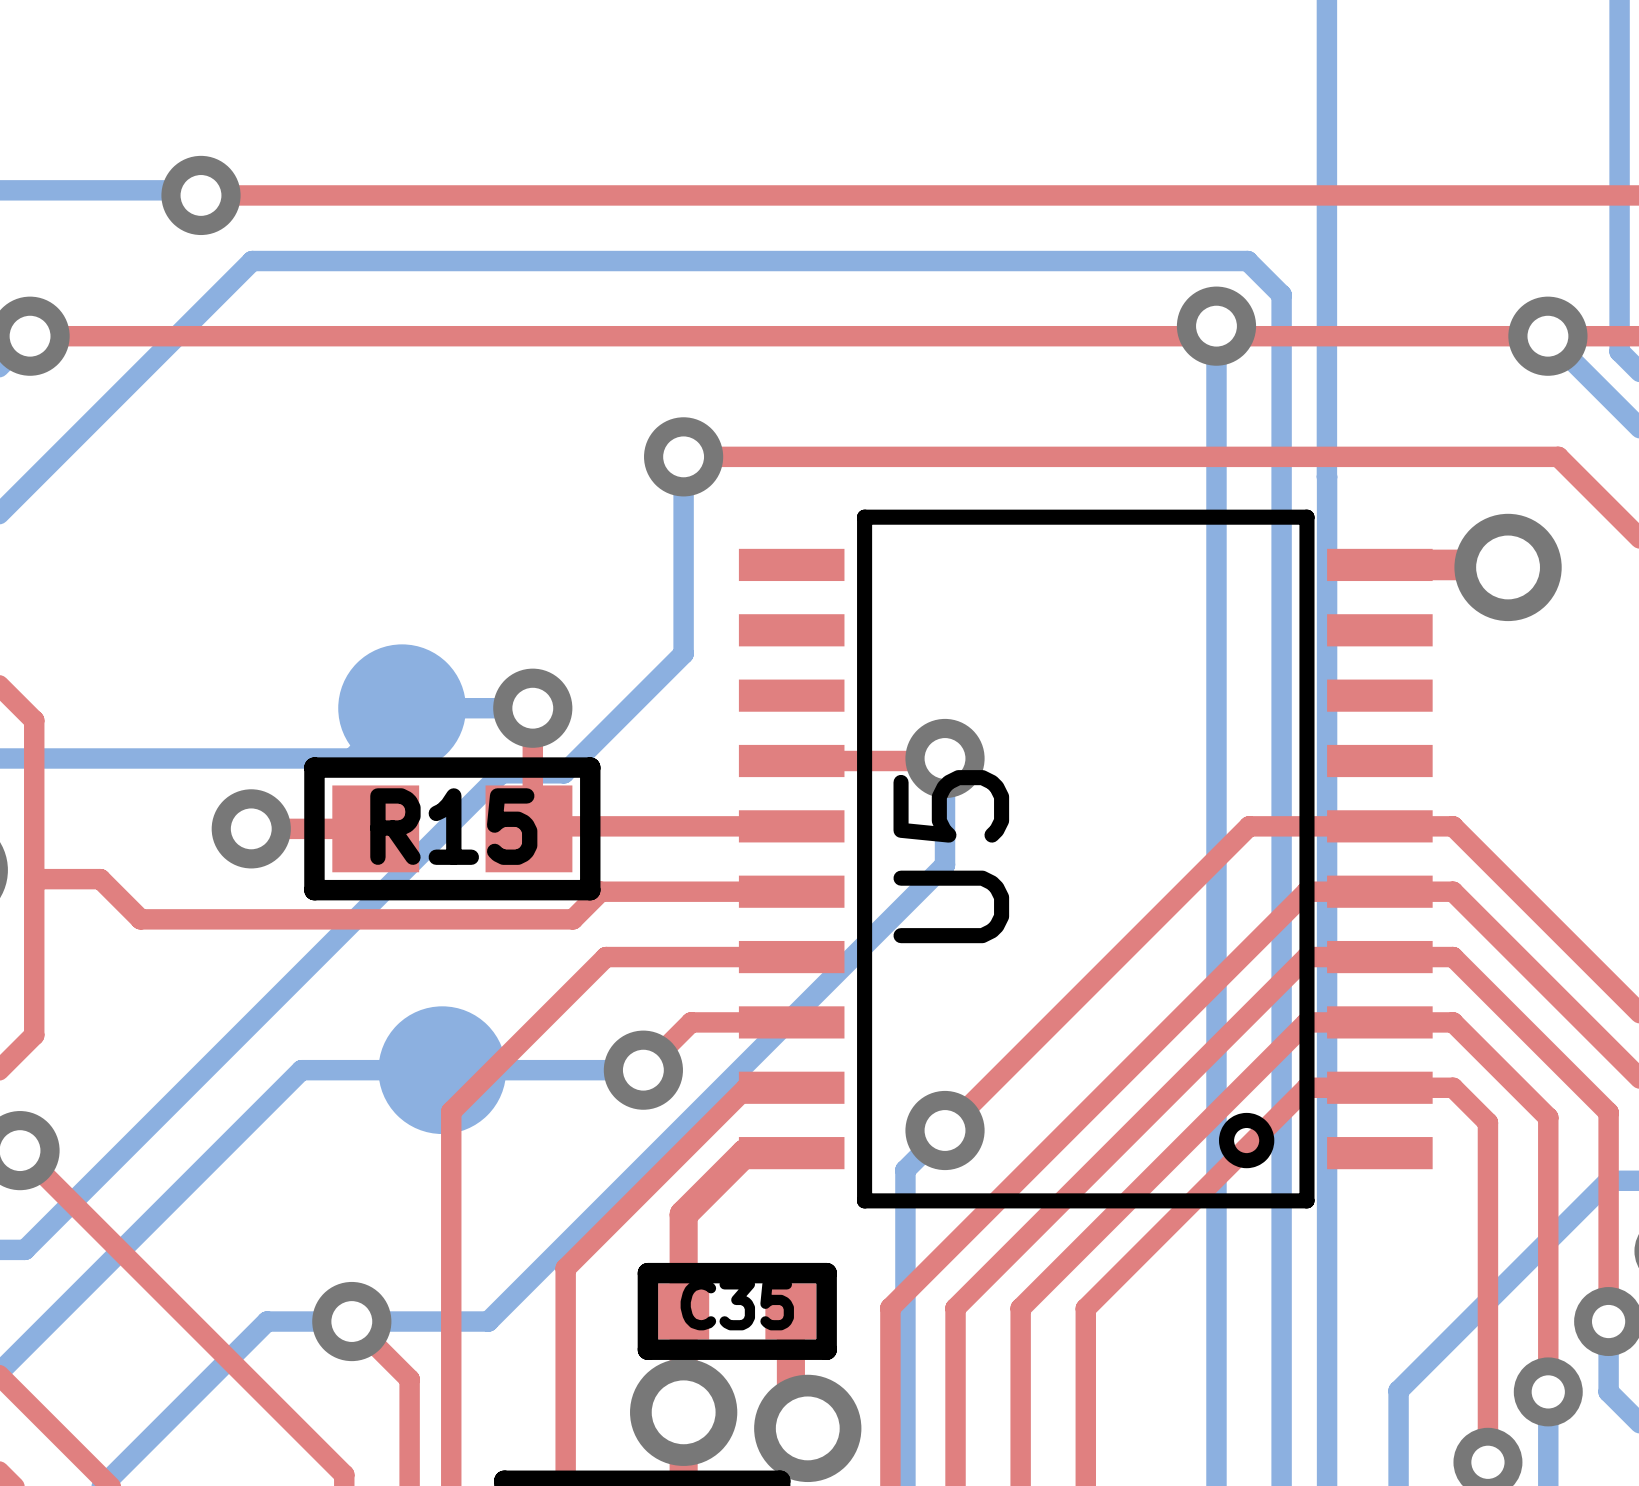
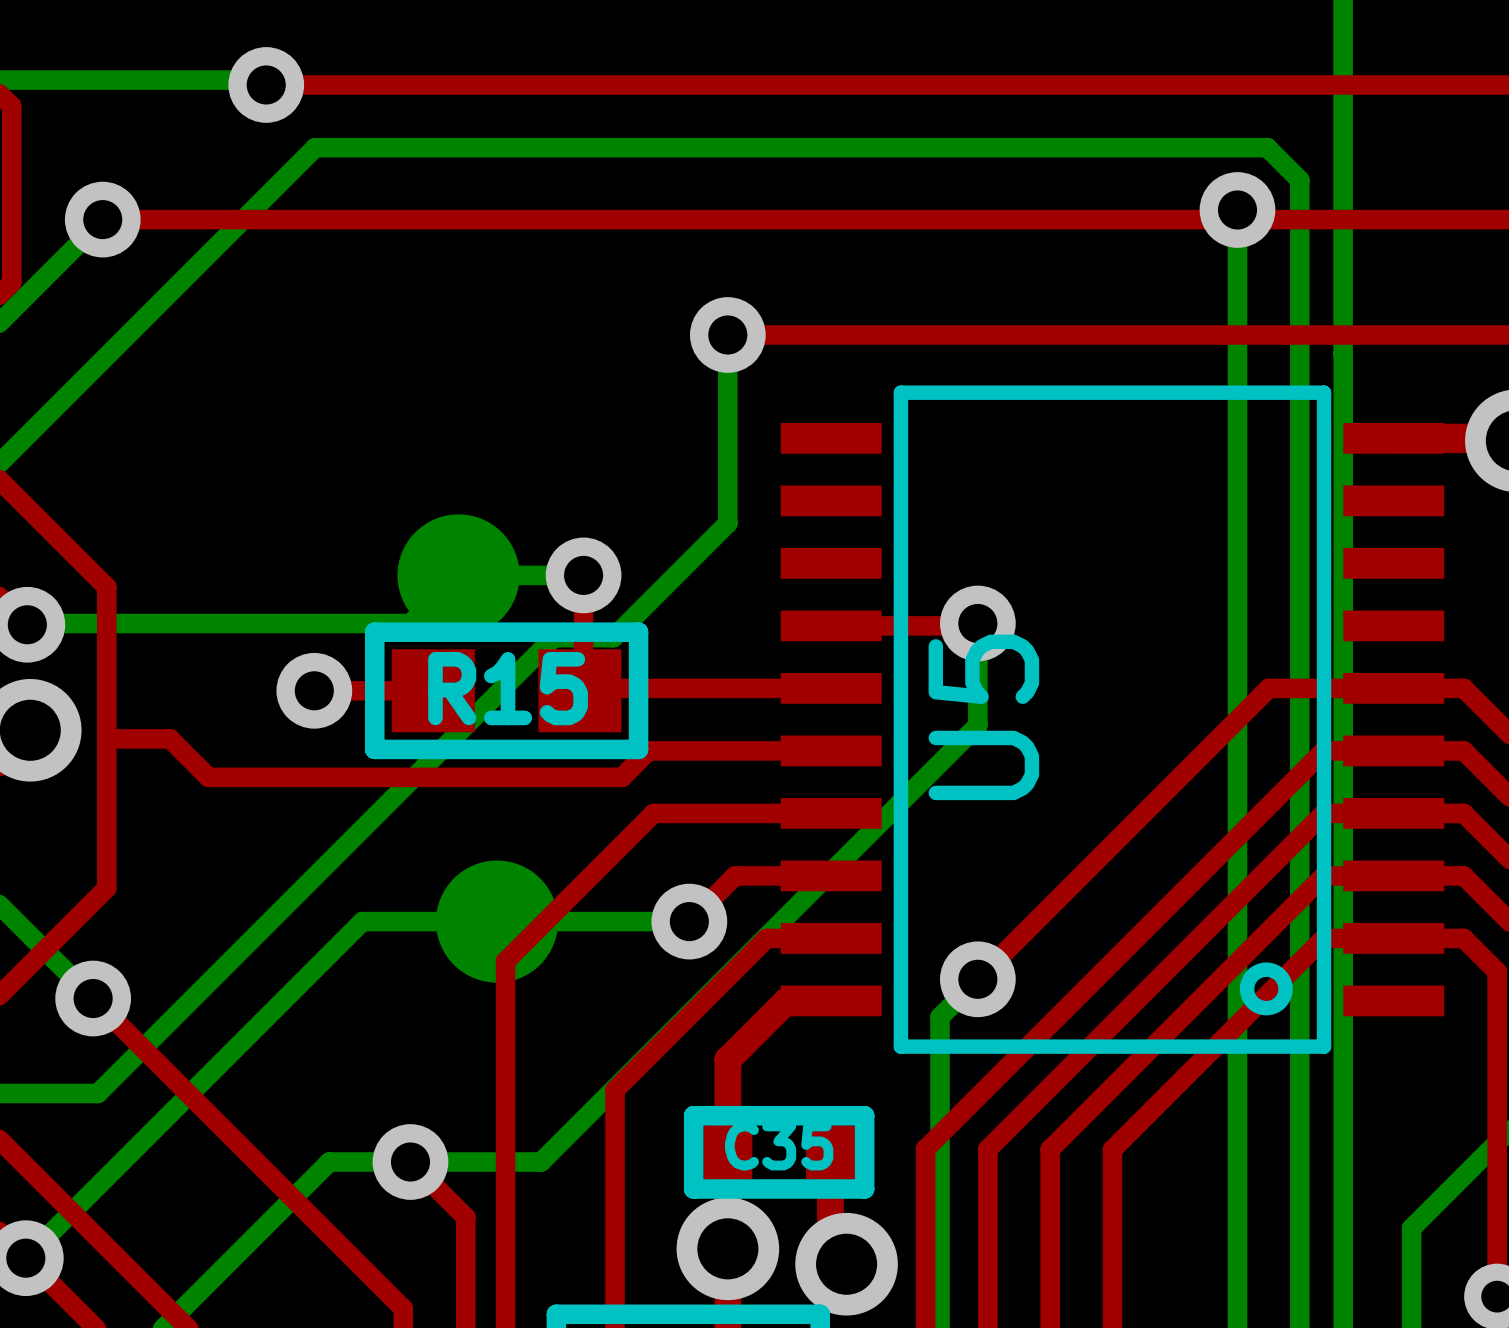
top track: (746, 1087) (565, 1268) -> (787, 938) (766, 938) (615, 1090) (615, 1111)

